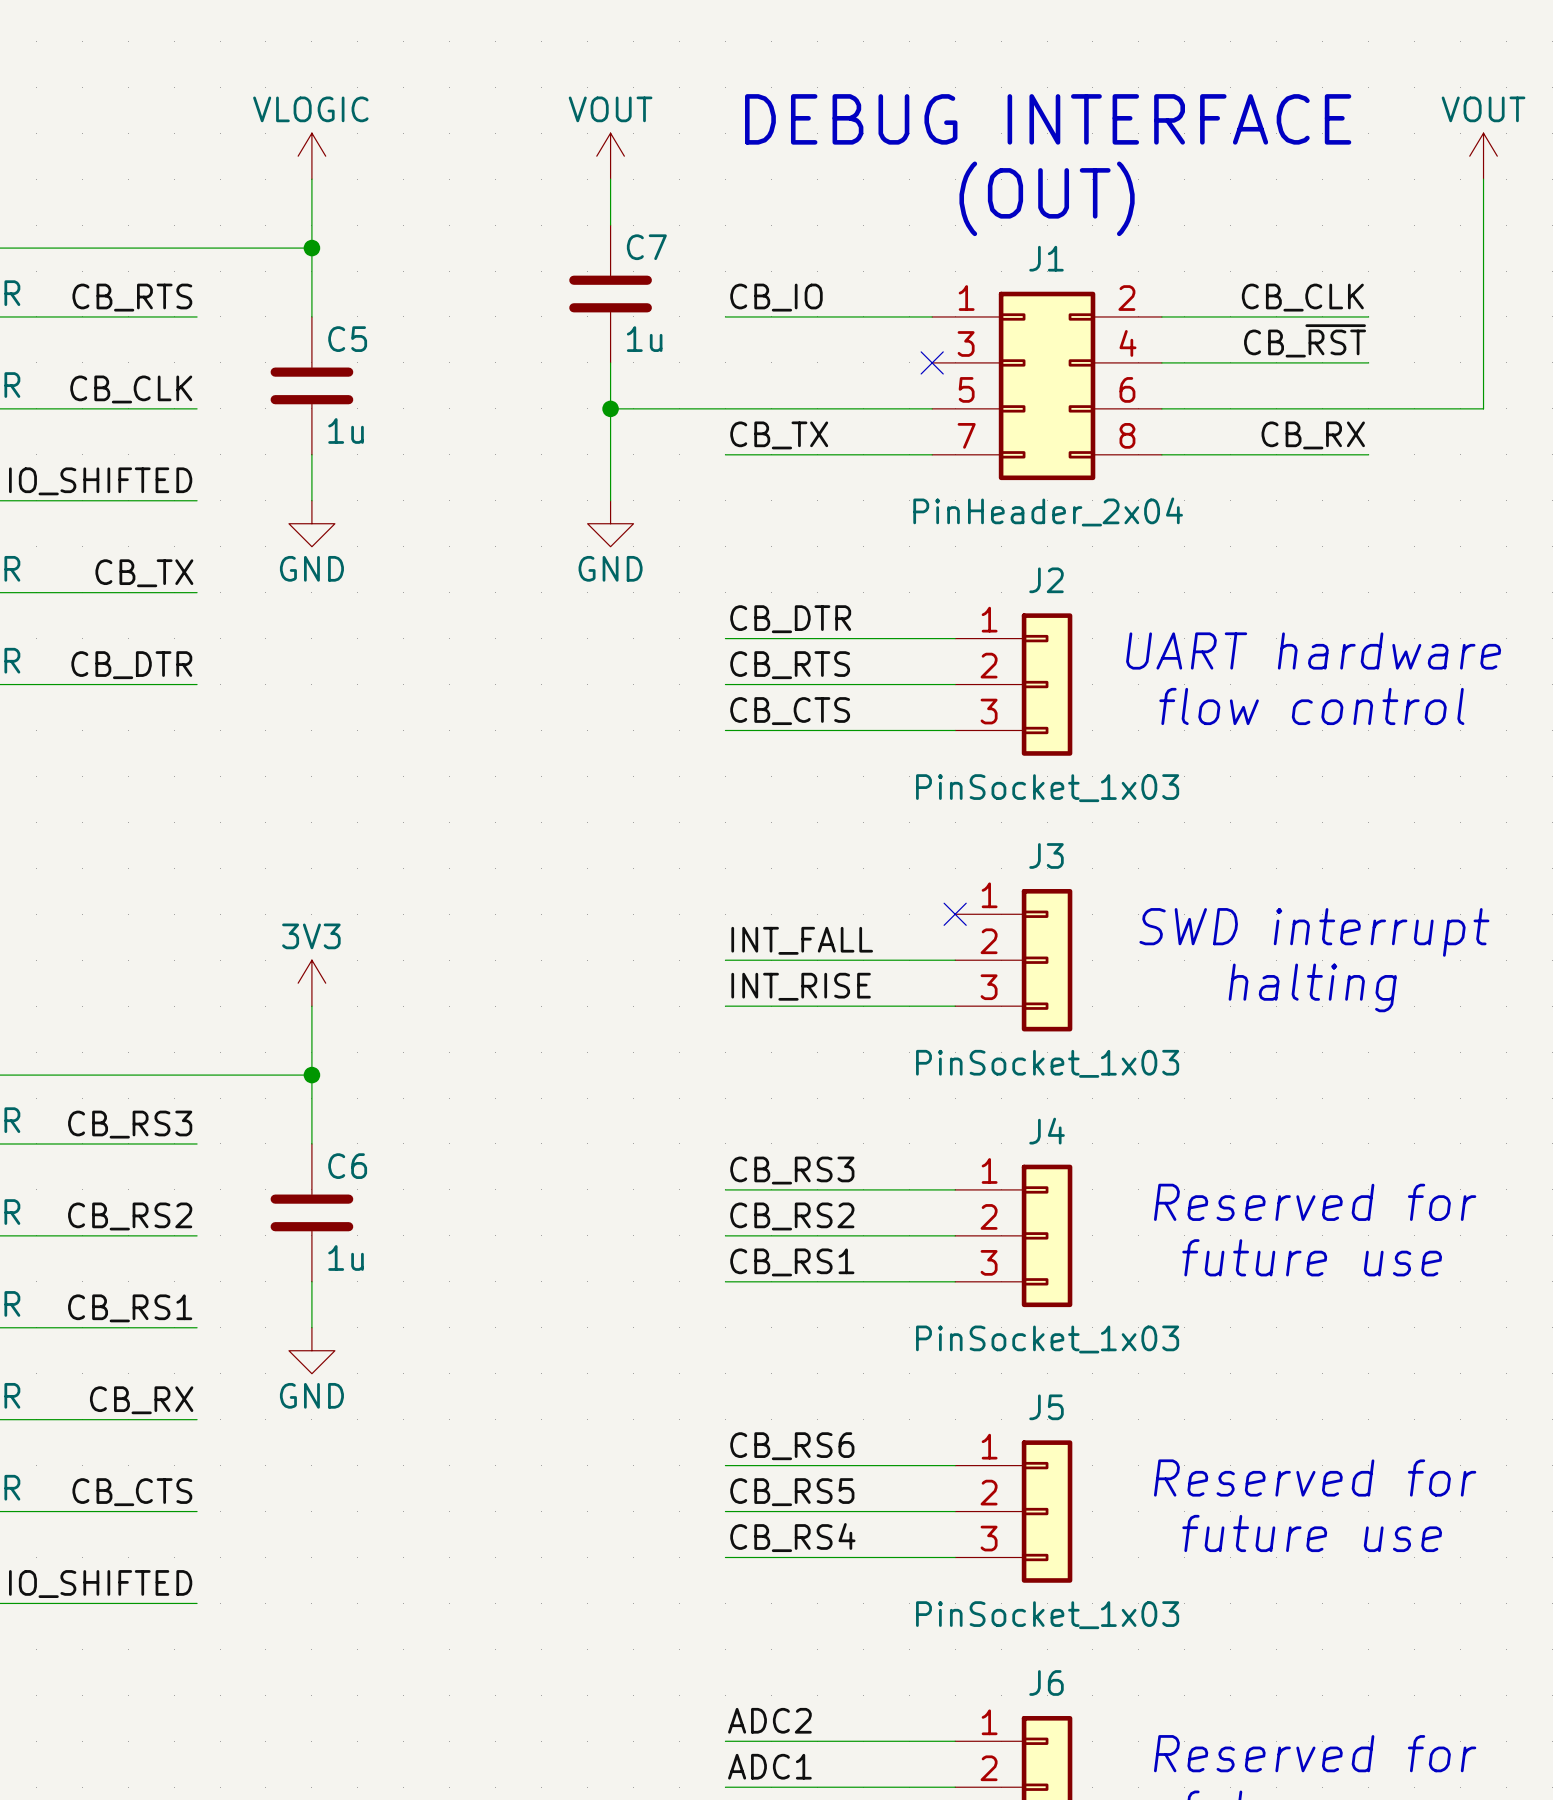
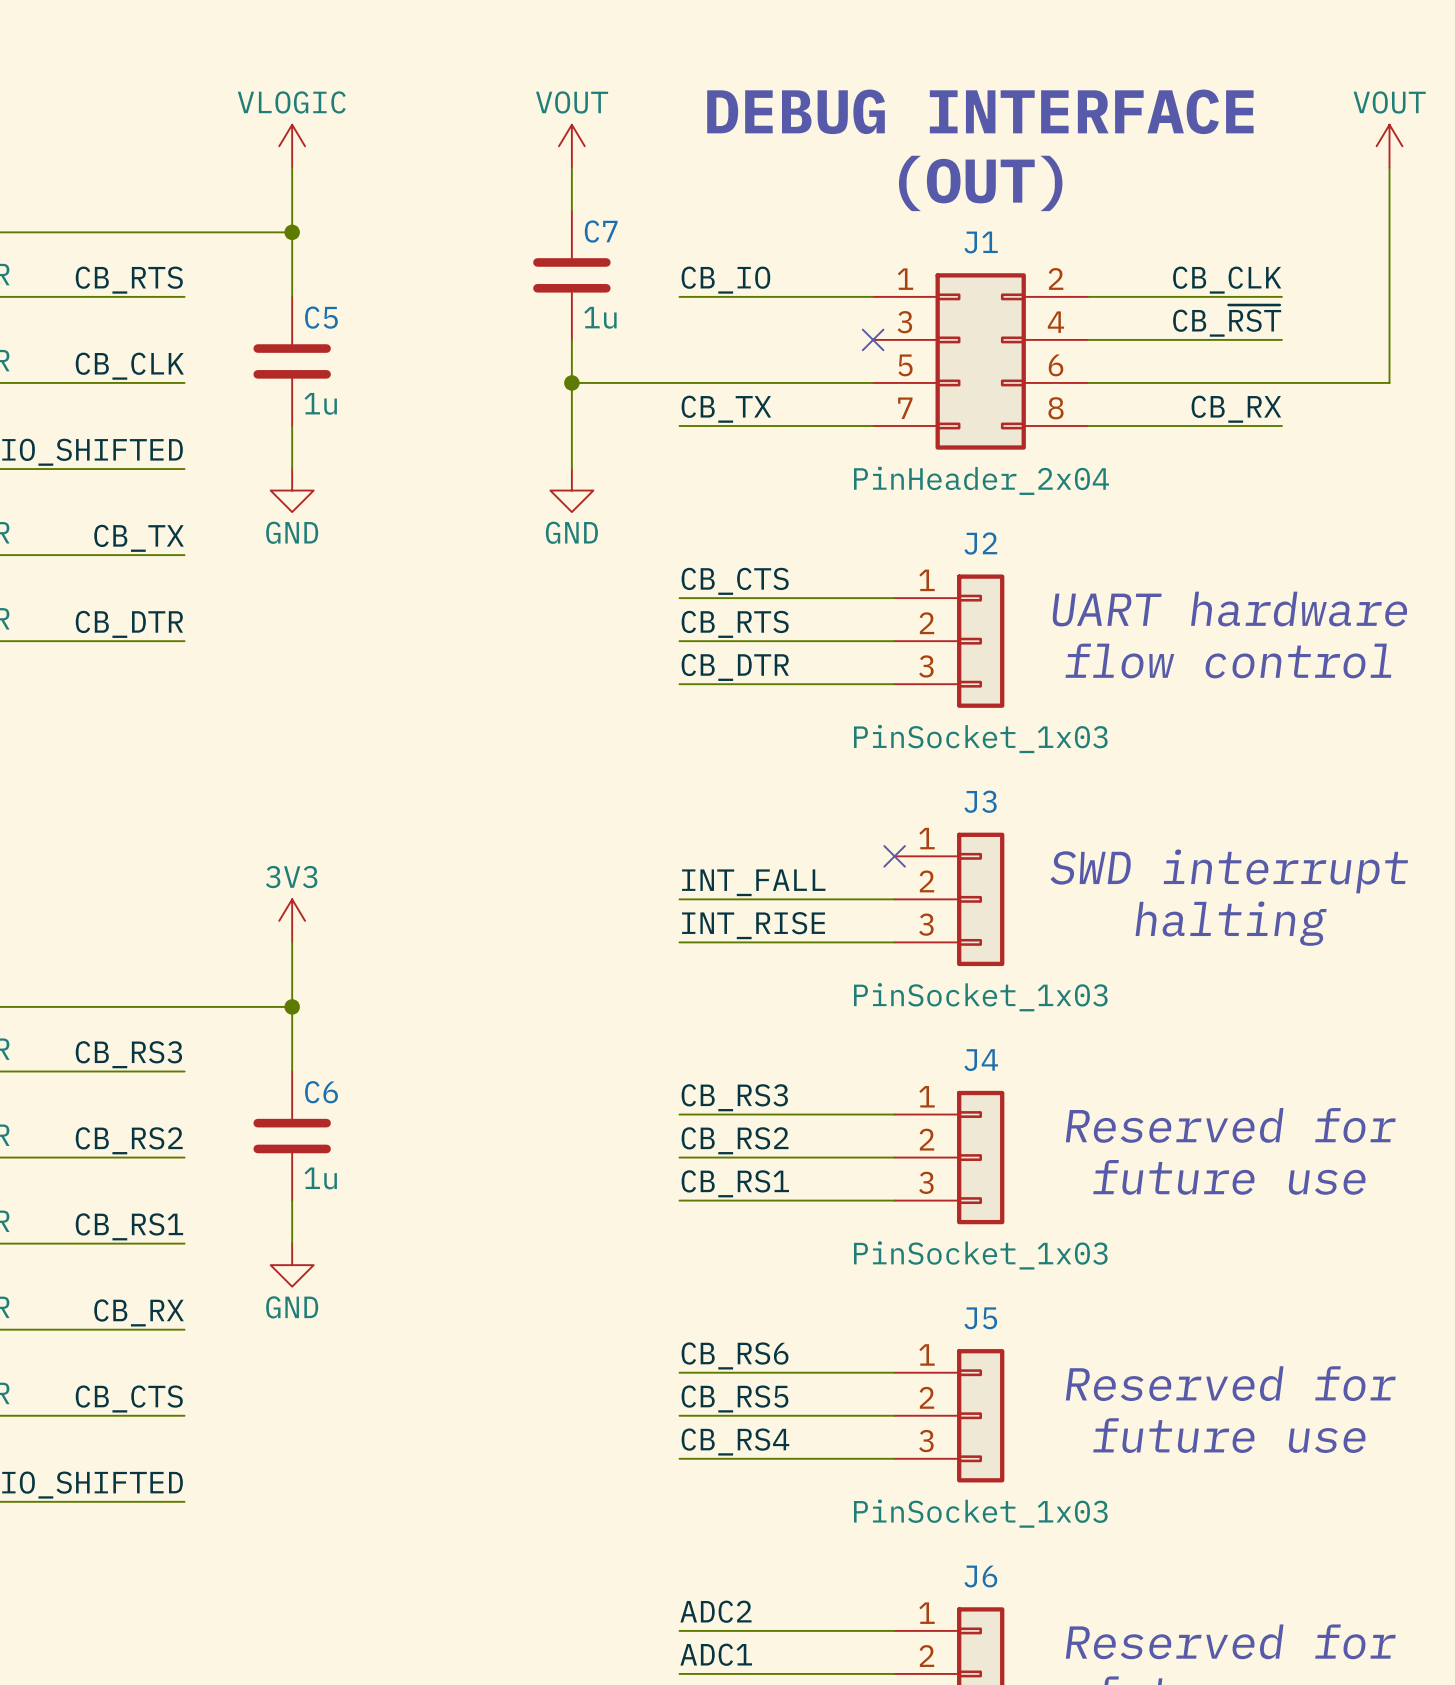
label: CB_DTR (790, 619) -> CB_CTS (735, 581)
label: CB_CTS (790, 711) -> CB_DTR (735, 667)

